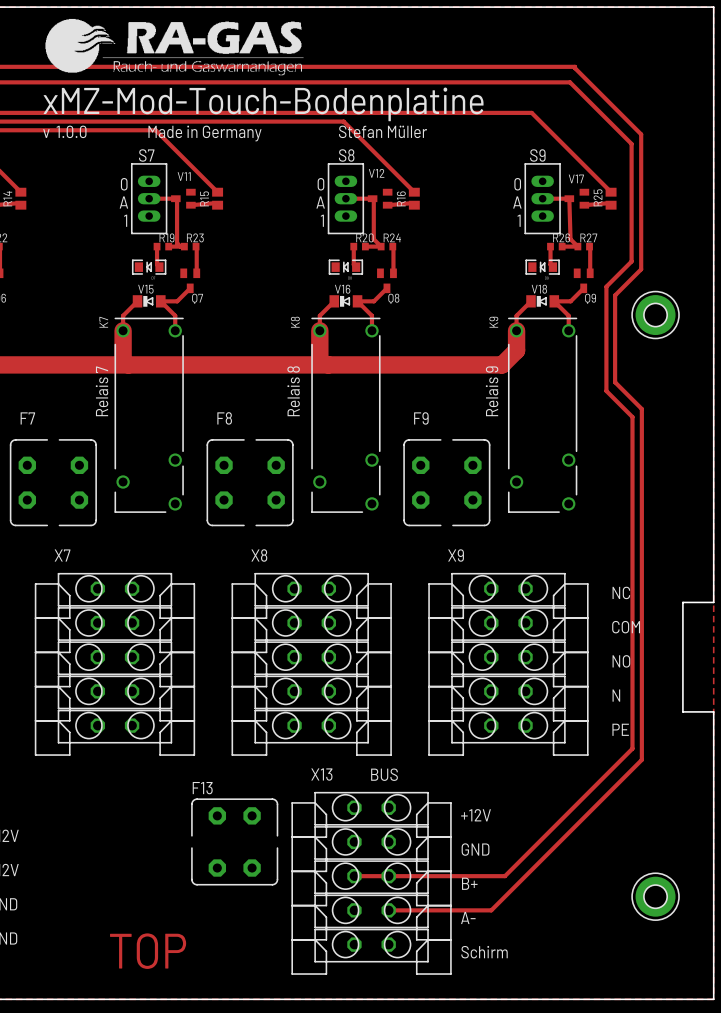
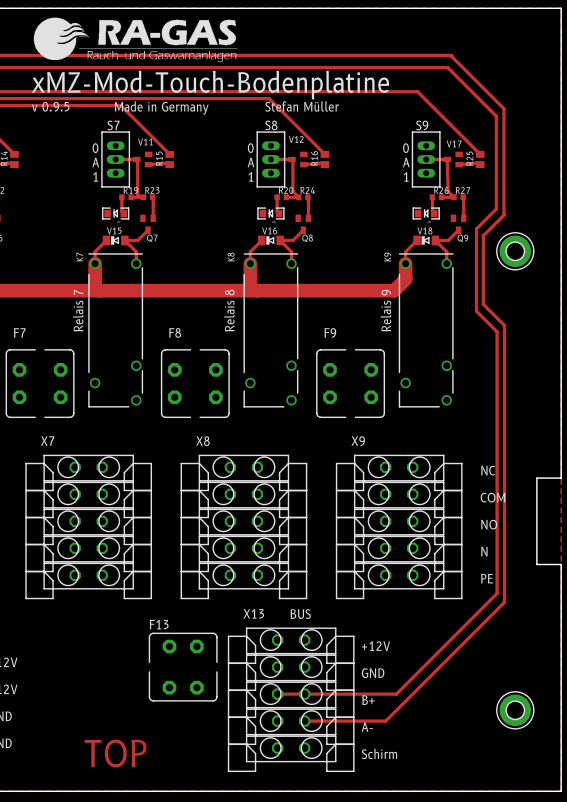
drawing shape: [43, 87, 484, 142] -> [31, 70, 390, 115]

